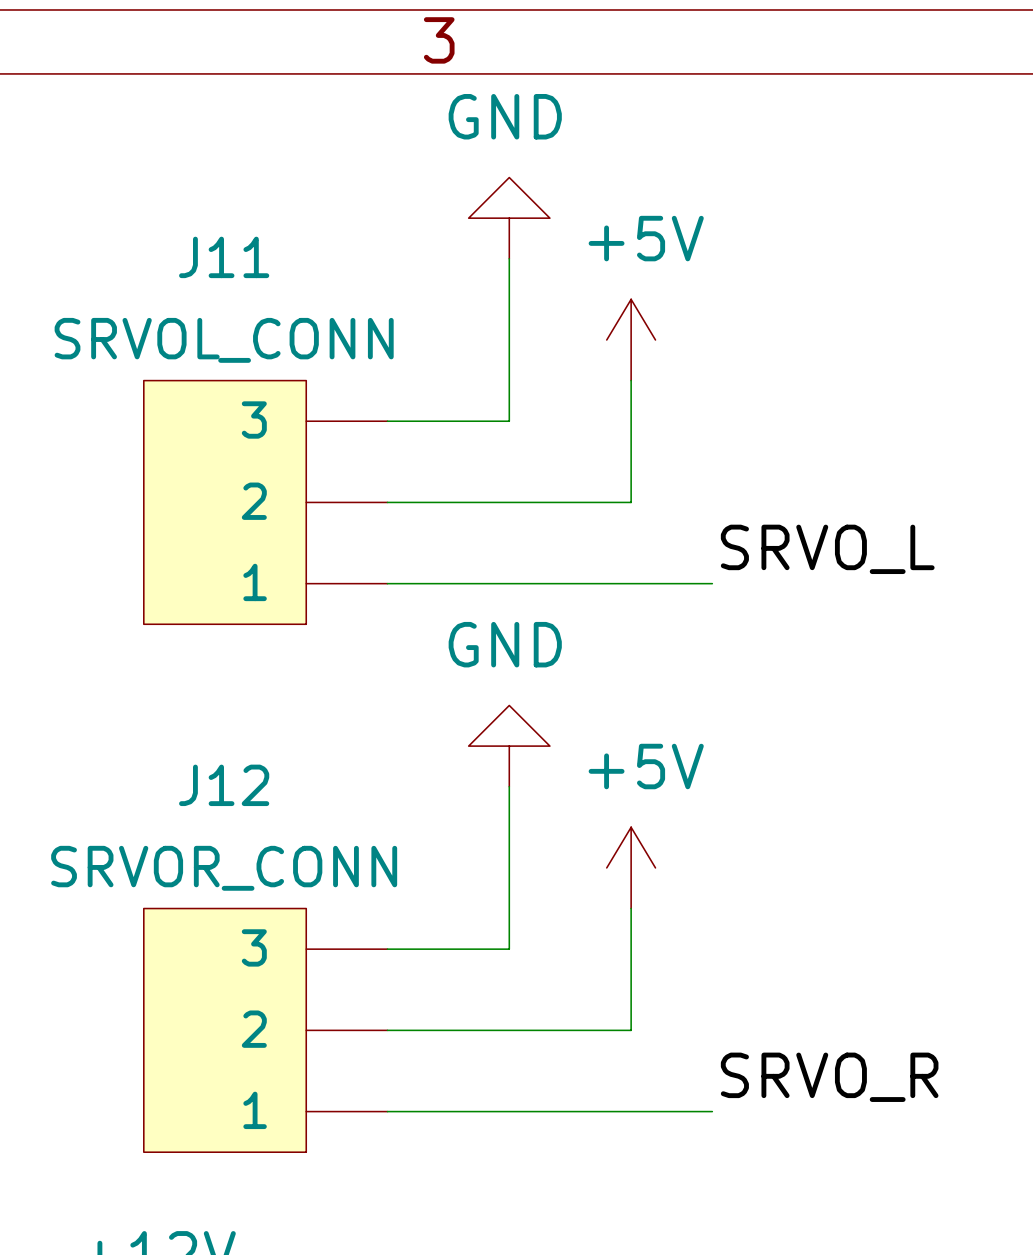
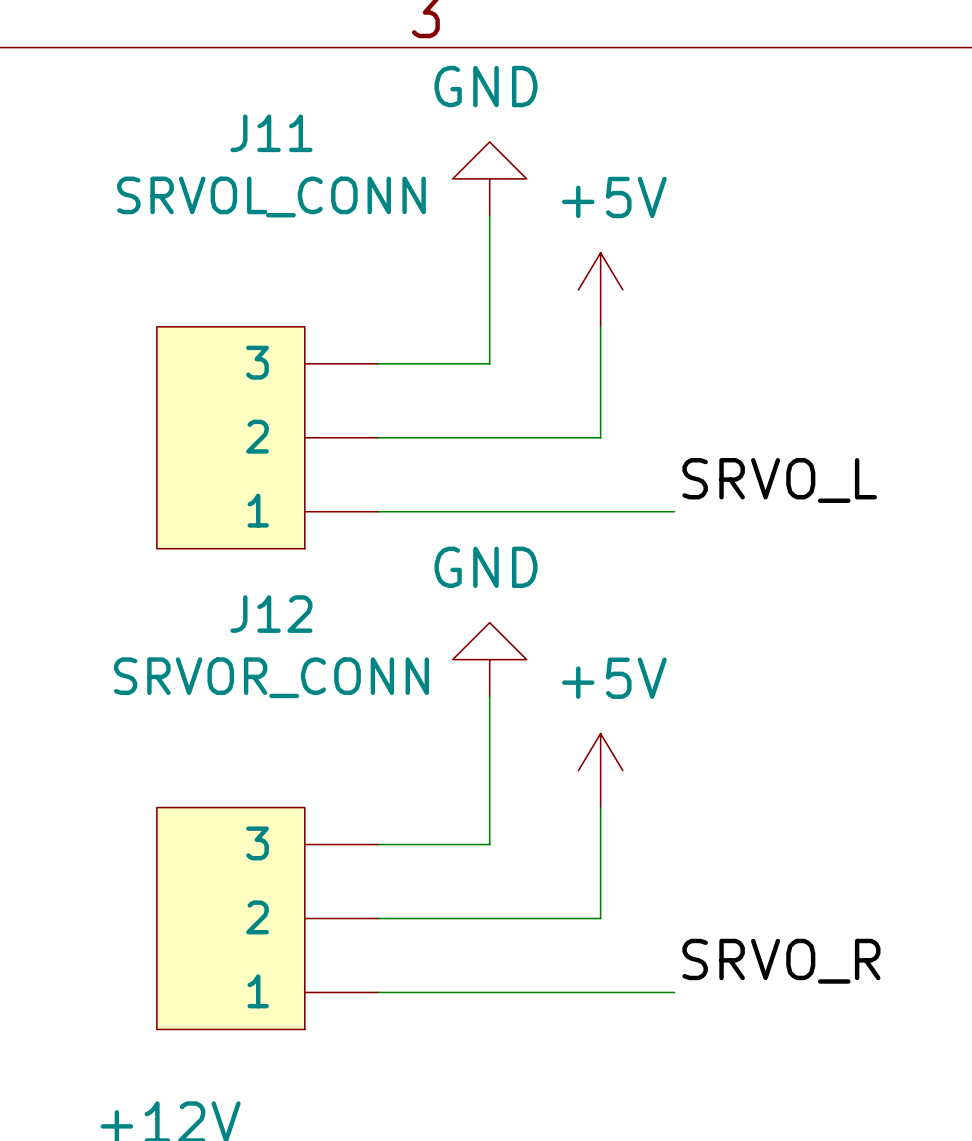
J11 name position: J11 (224, 257) -> J11 (271, 133)
J11 value position: SRVOL_CONN (224, 340) -> SRVOL_CONN (271, 196)
J12 name position: J12 (224, 785) -> J12 (271, 614)
J12 value position: SRVOR_CONN (224, 868) -> SRVOR_CONN (271, 677)

